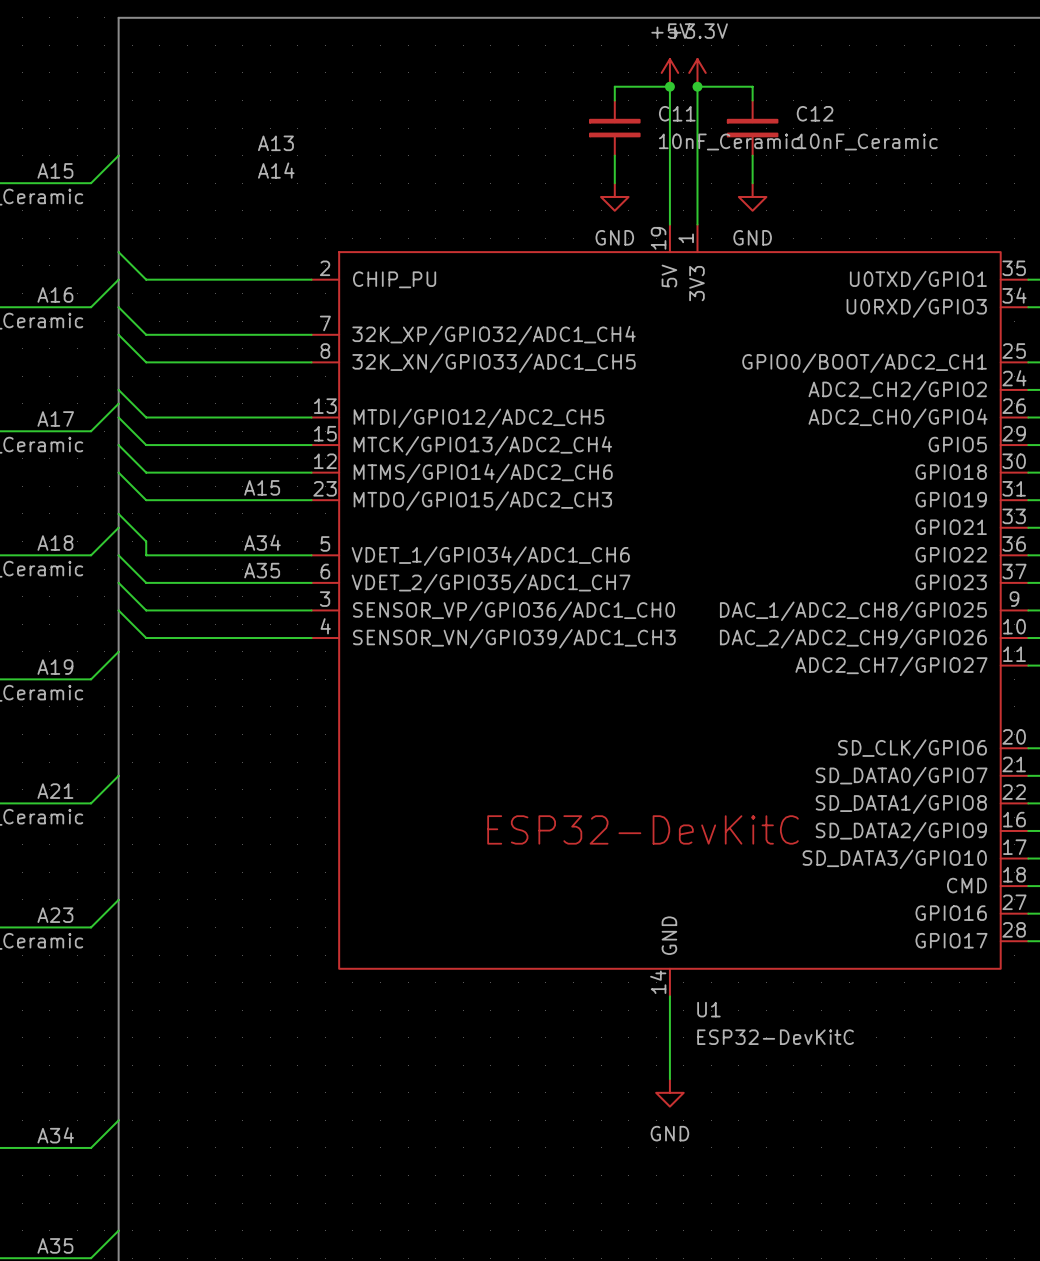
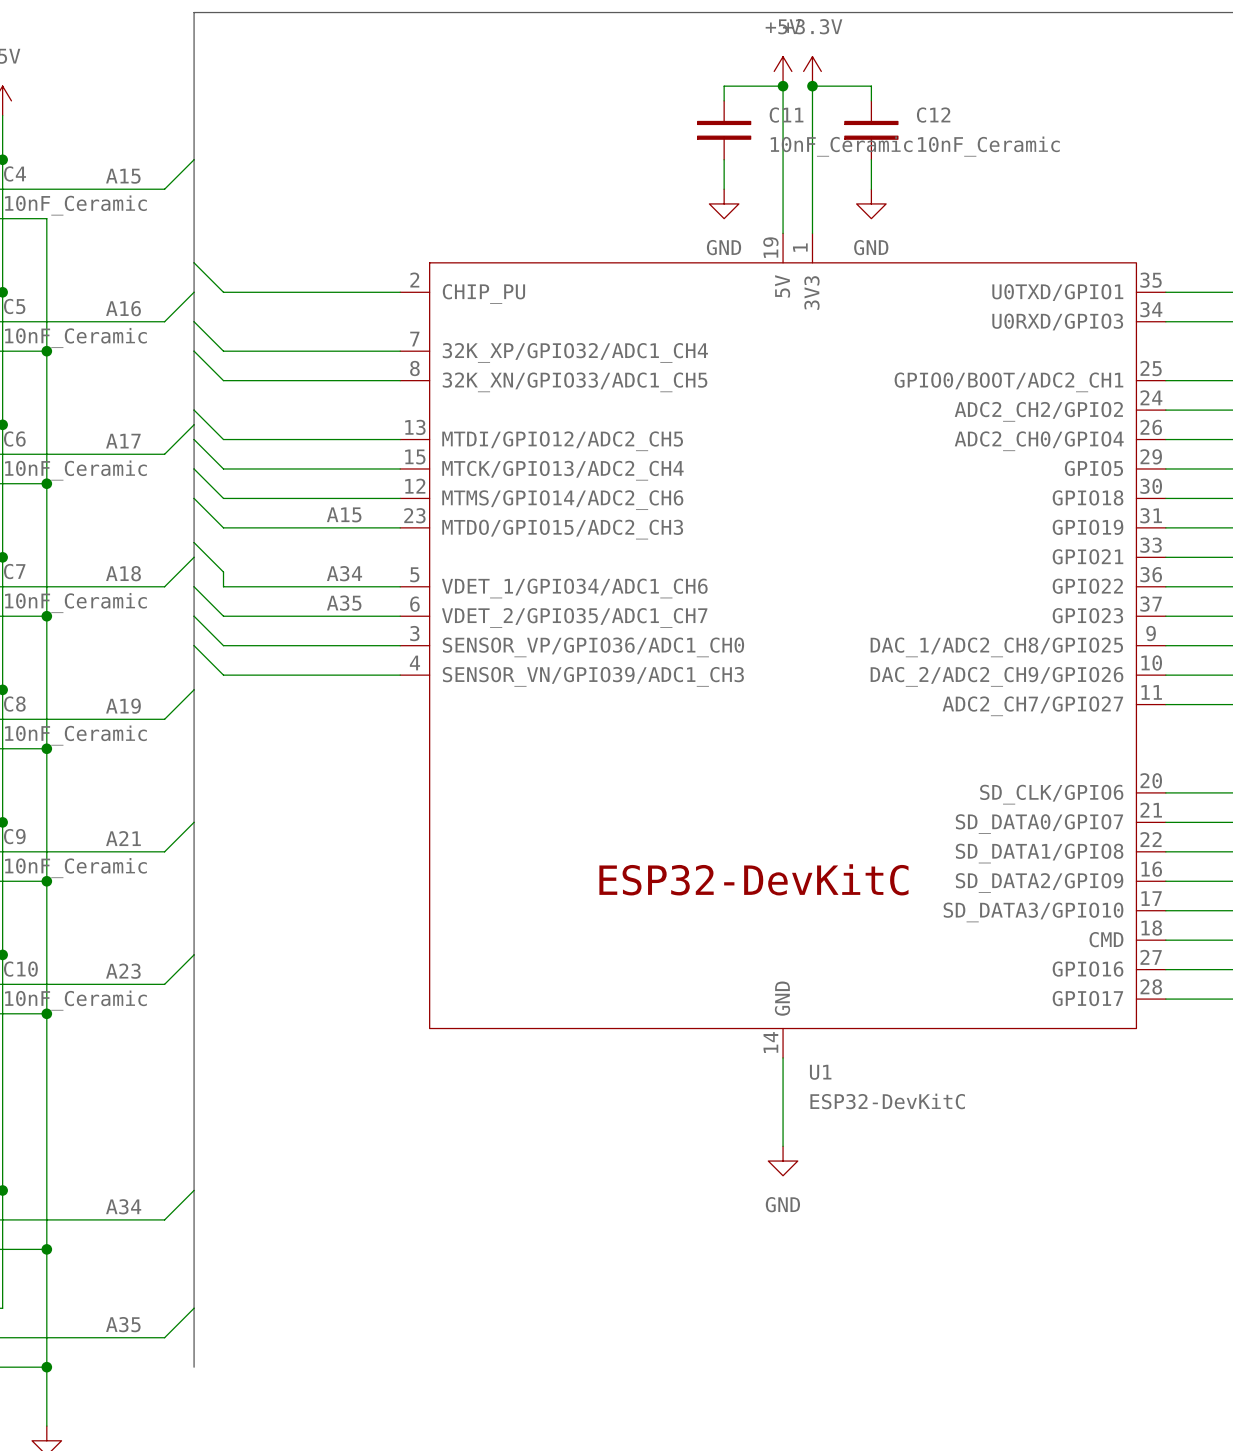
label: A13 (275, 143) -> none
label: A14 (276, 170) -> none

